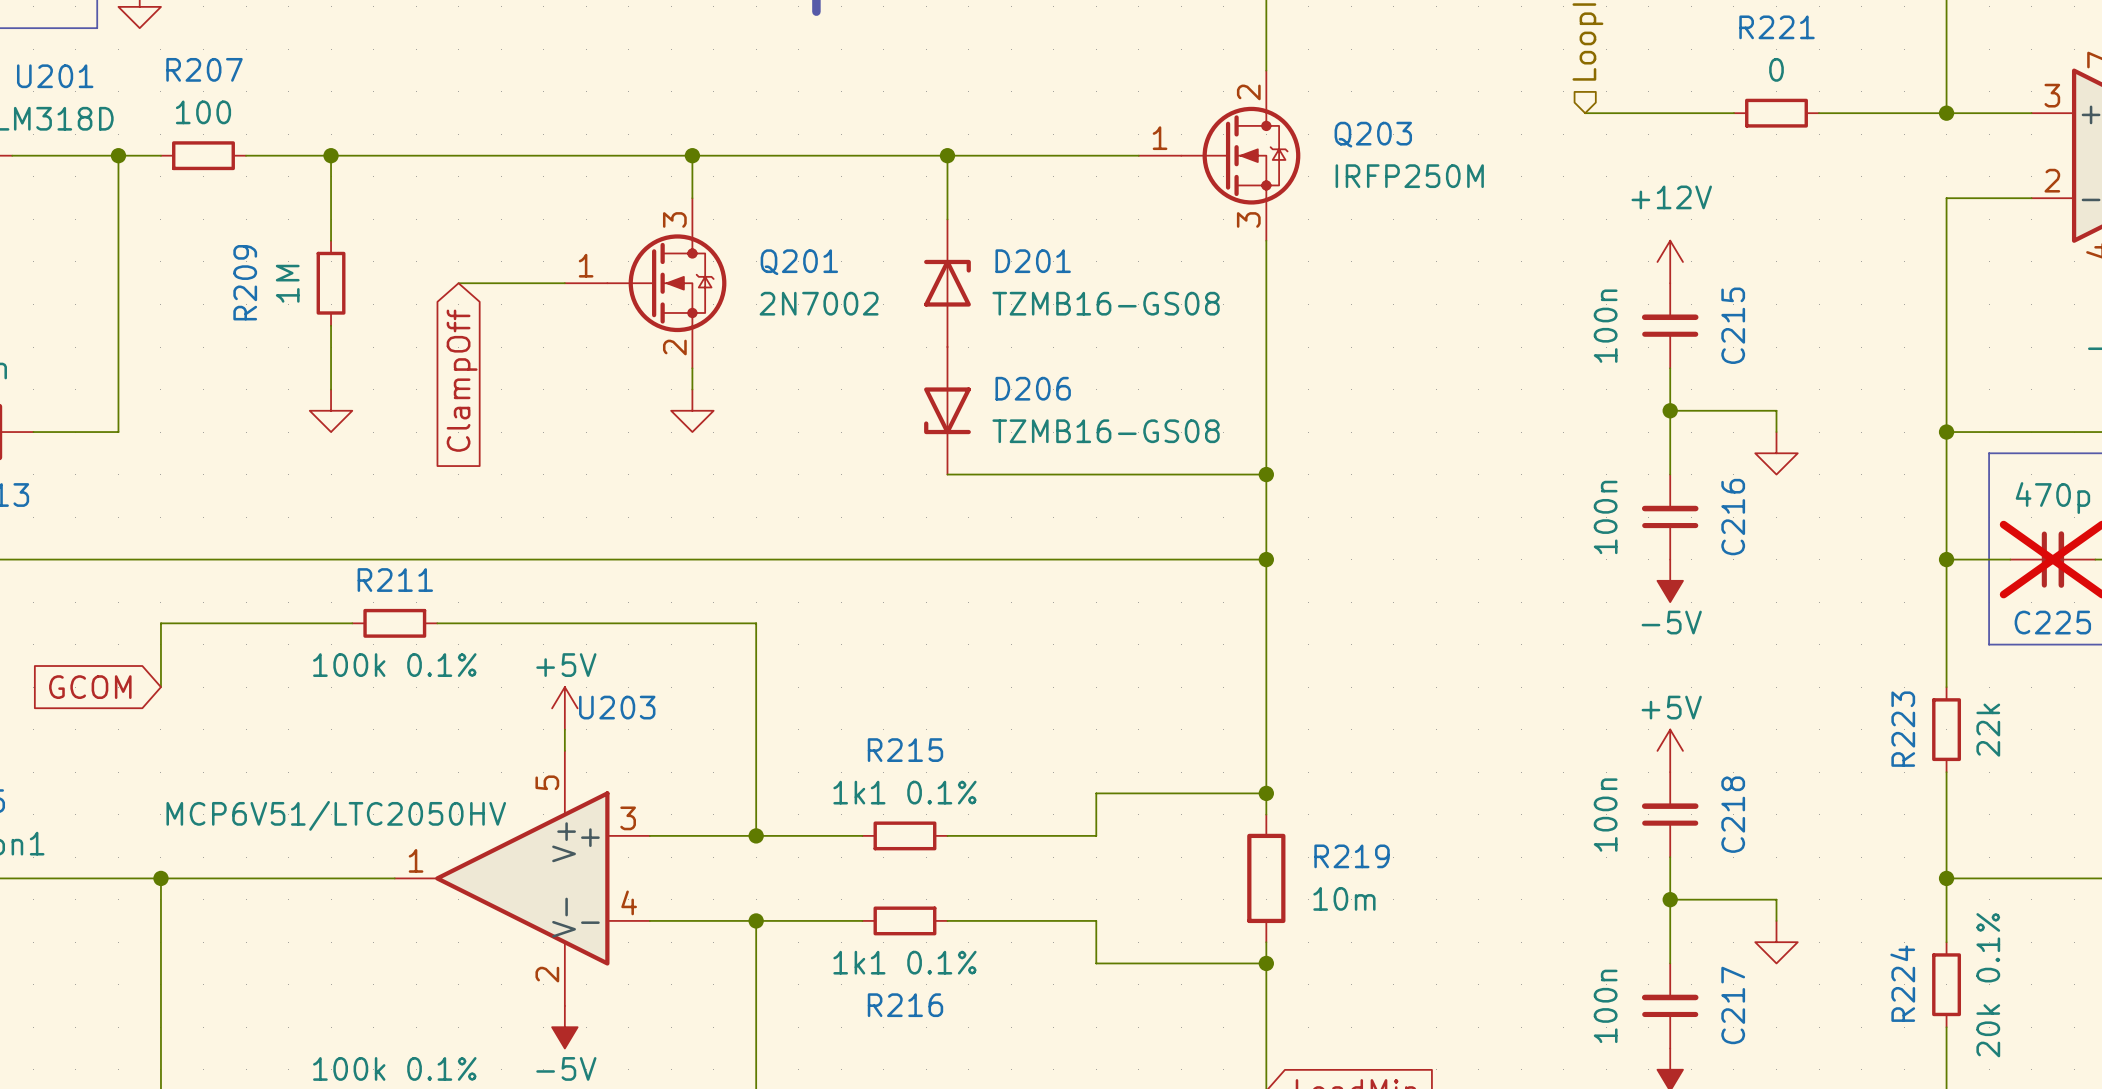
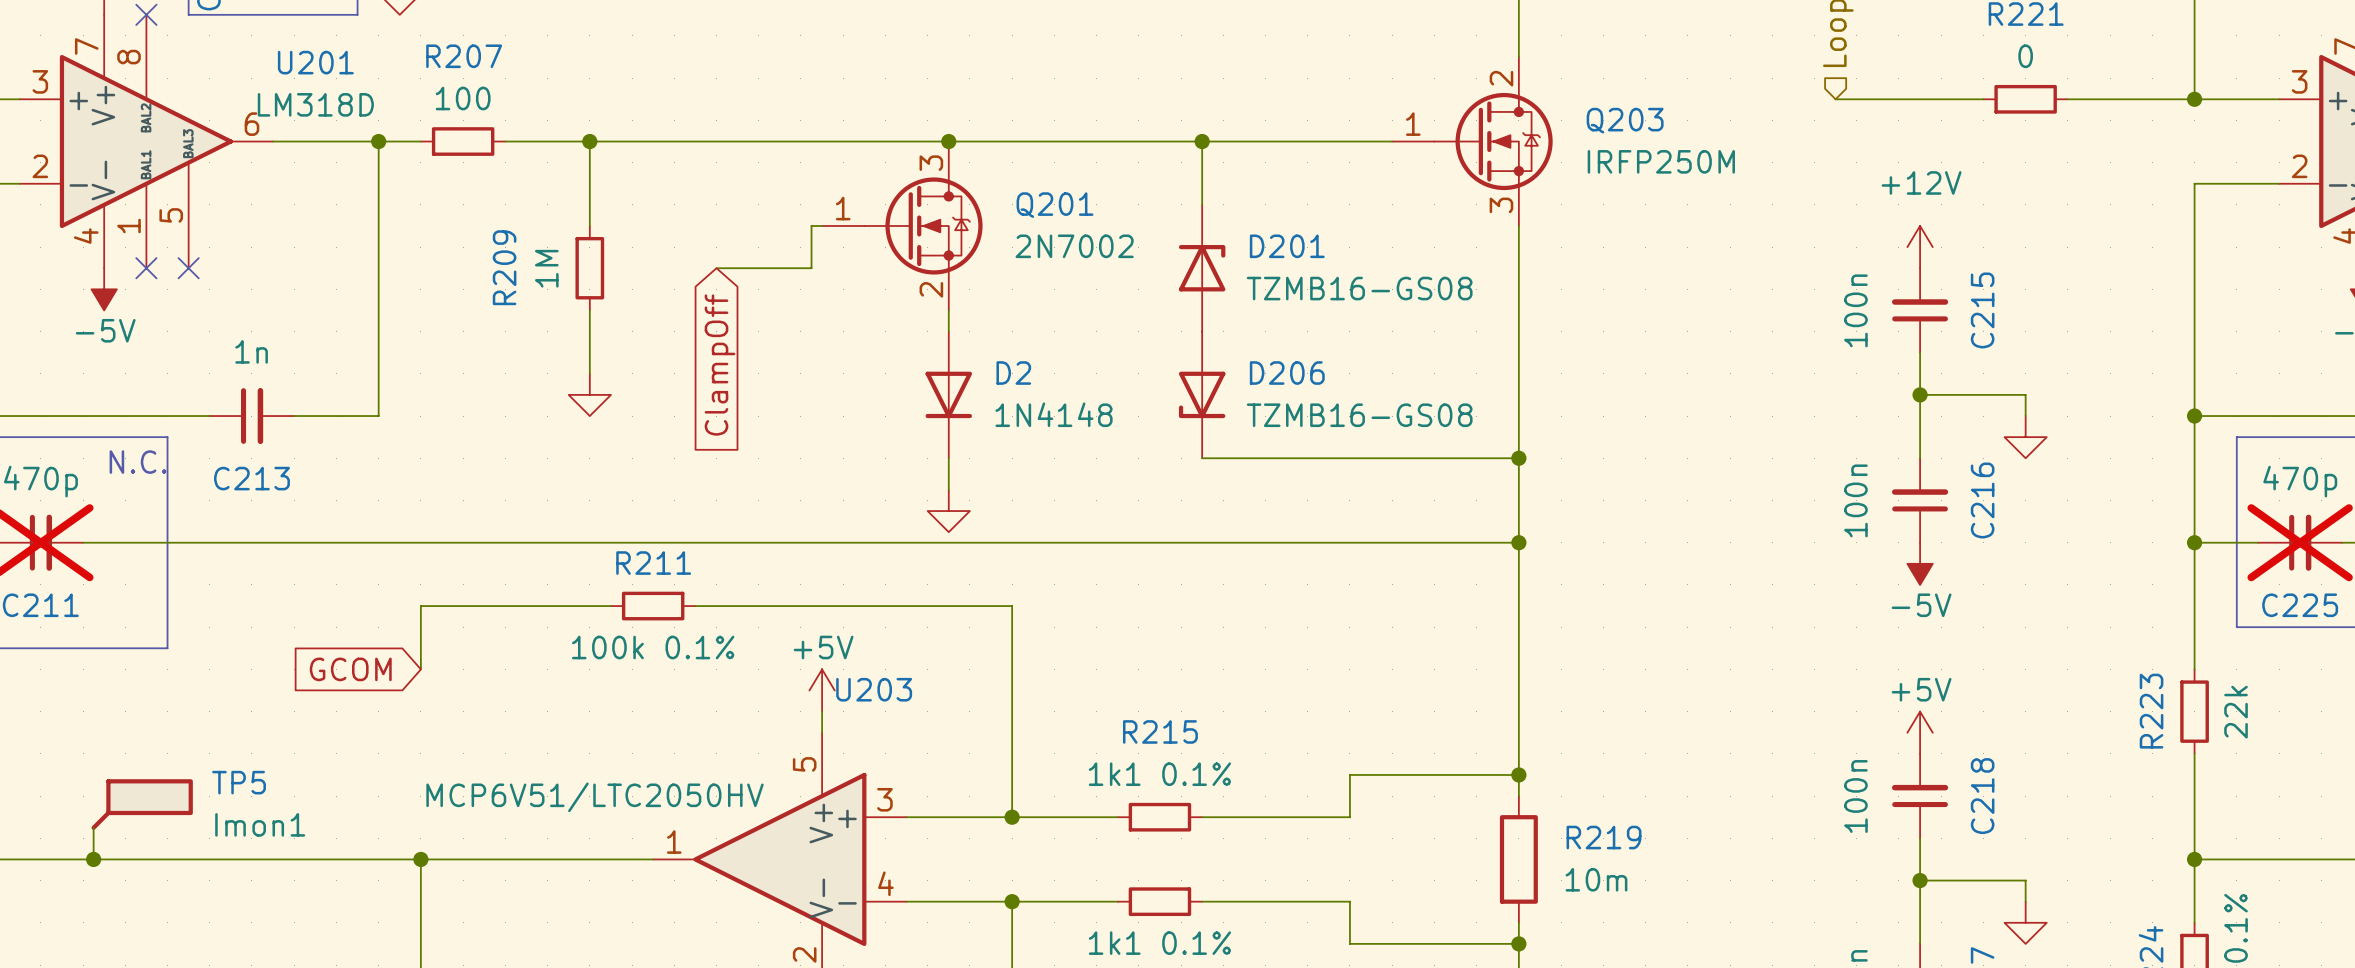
wire: (554, 283) (564, 283) -> (811, 268) (811, 225) (822, 225)
Q201 position: (645, 283) -> (902, 225)
power symbol position: (692, 410) -> (948, 511)
D2: none -> 1N4148 (948, 394)
wire: none -> (948, 458) (948, 489)

